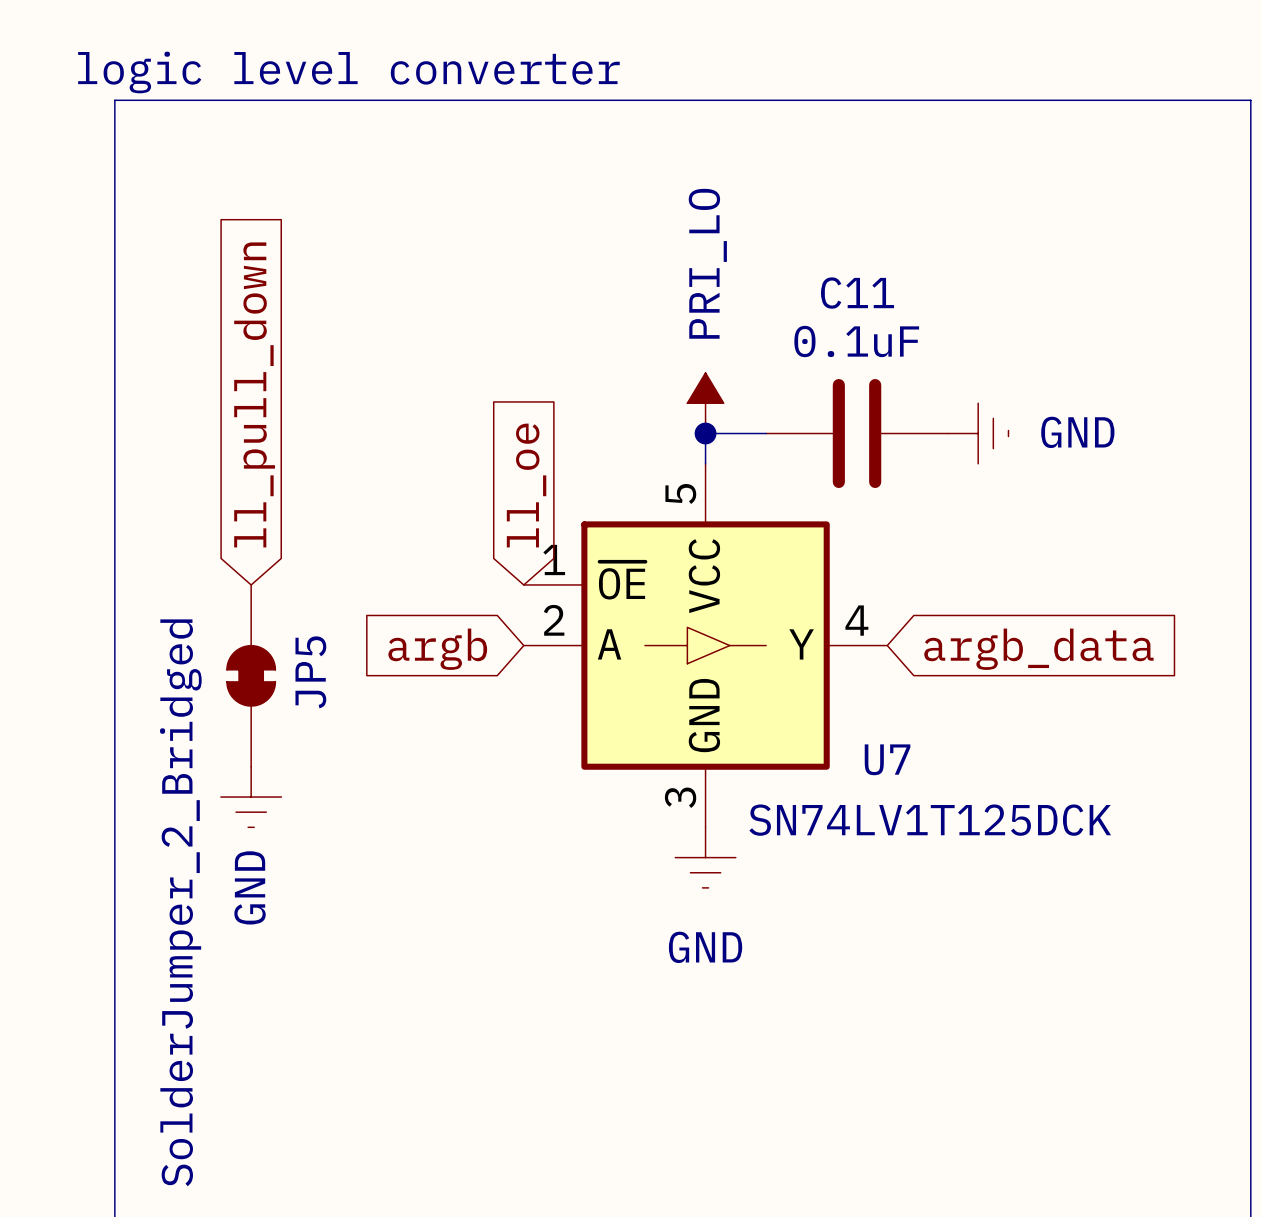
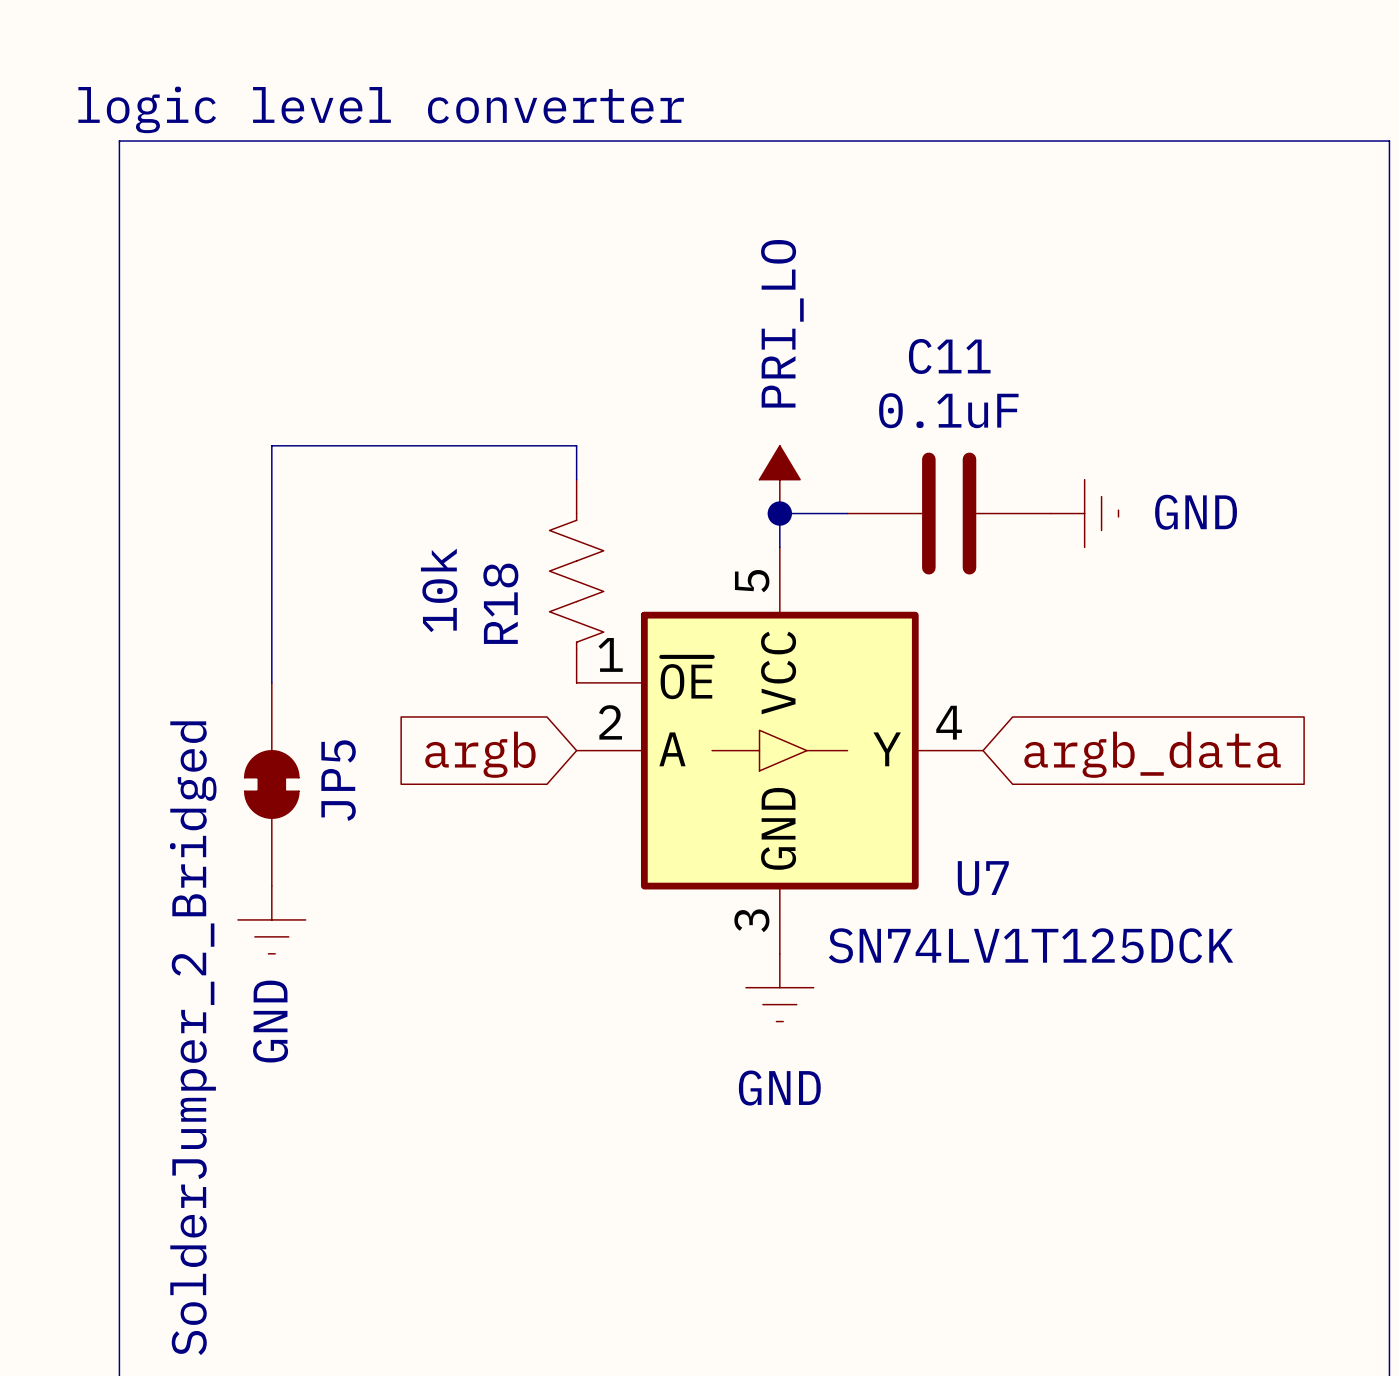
global label: ll_pull_down (254, 394) -> none
wire: none -> (576, 479) (576, 445) (271, 445) (271, 682)
global label: ll_oe (526, 485) -> none
R18: none -> 10k (576, 581)

